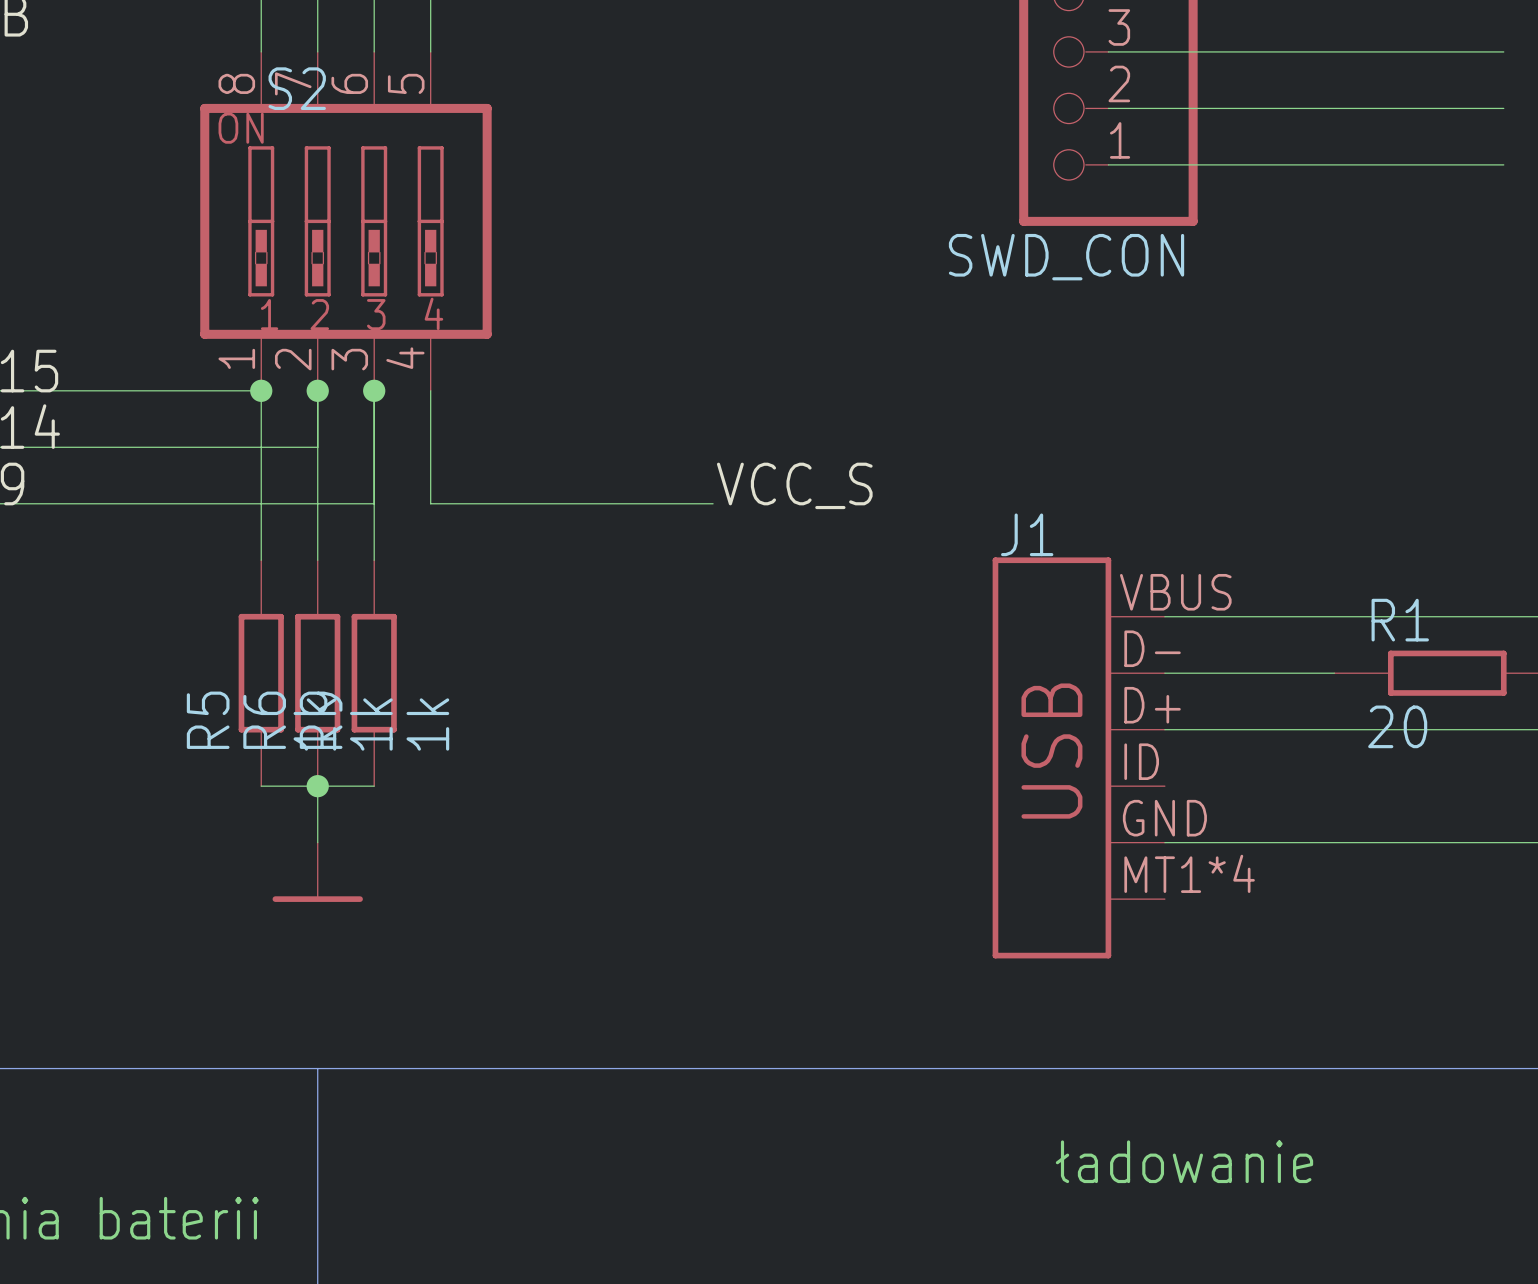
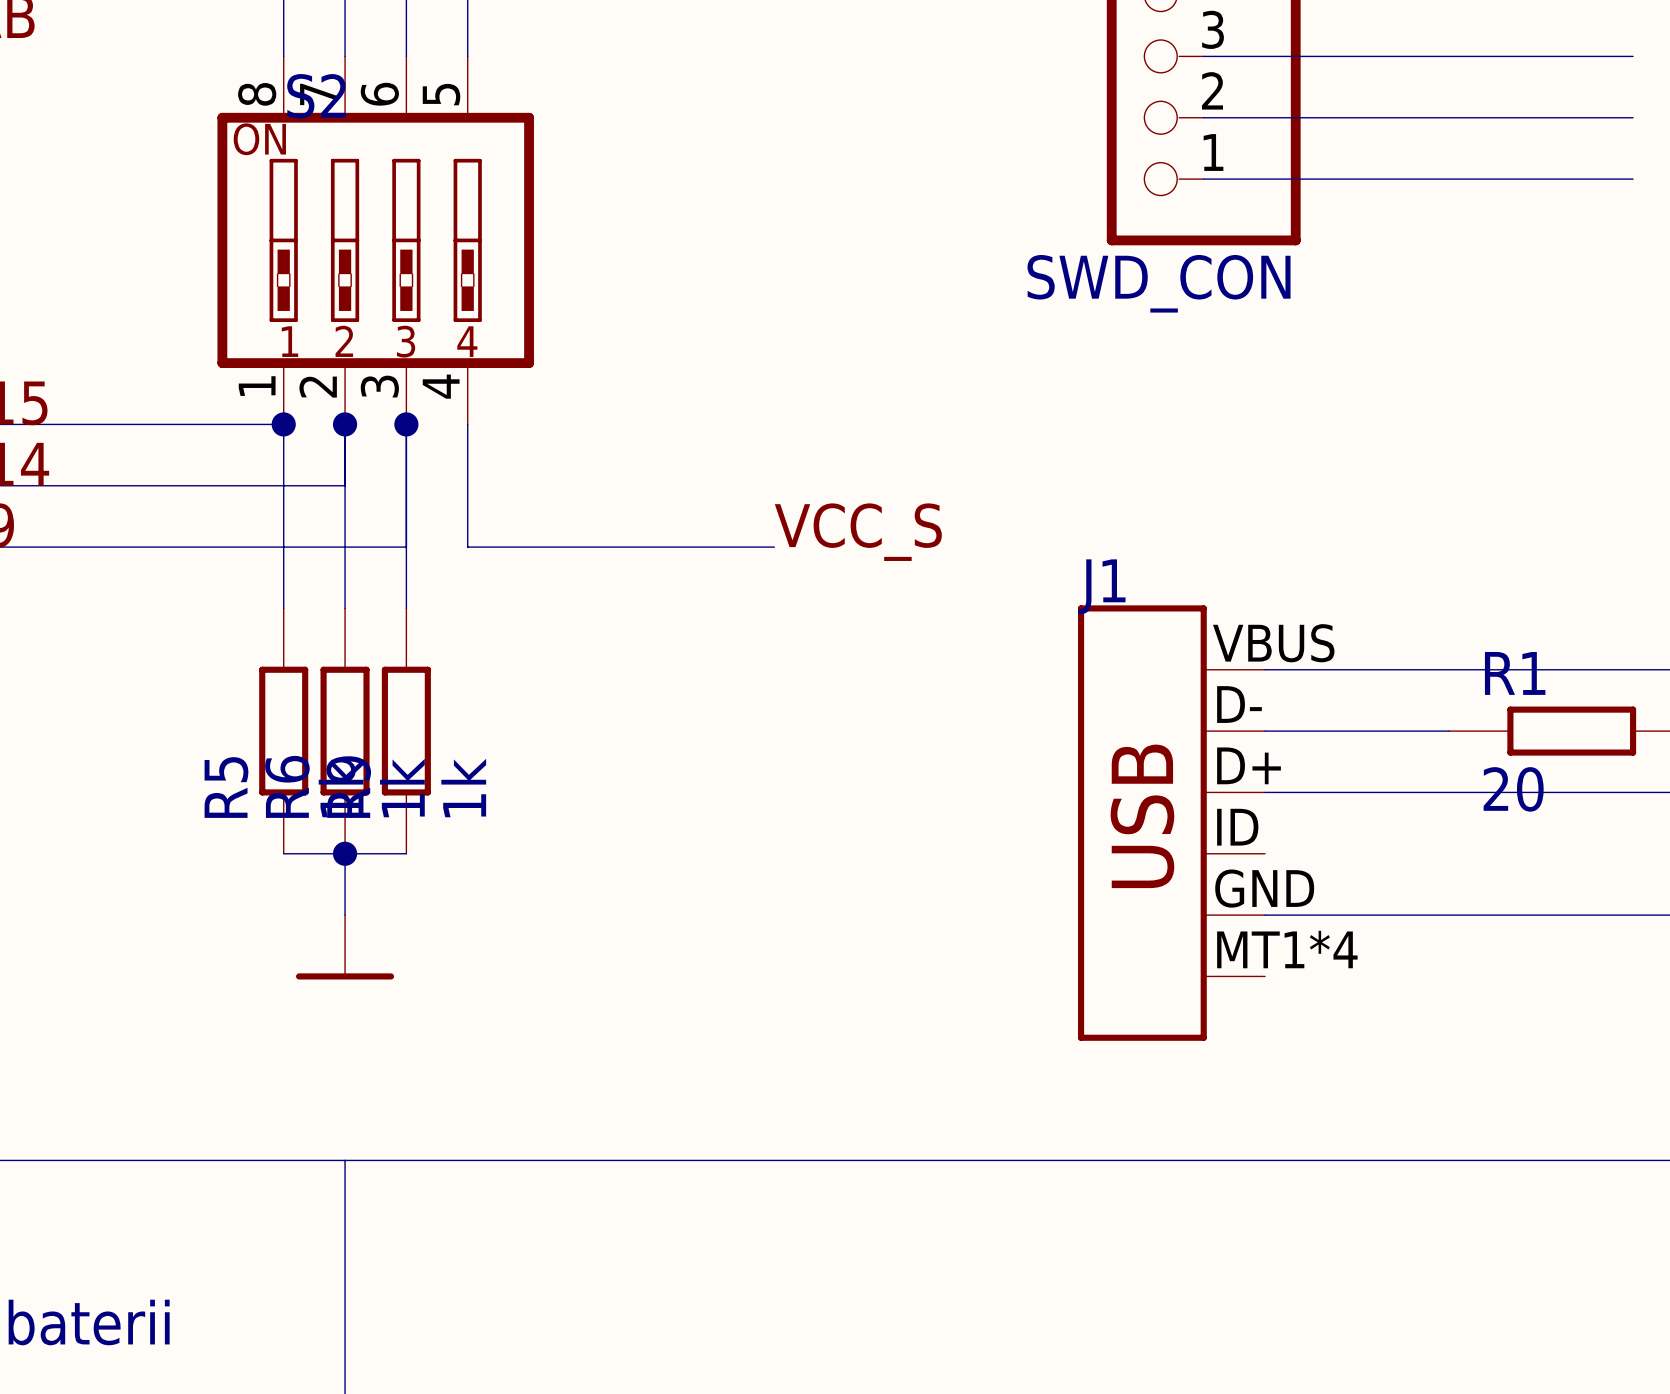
text: ładowanie (1184, 1161) -> none

